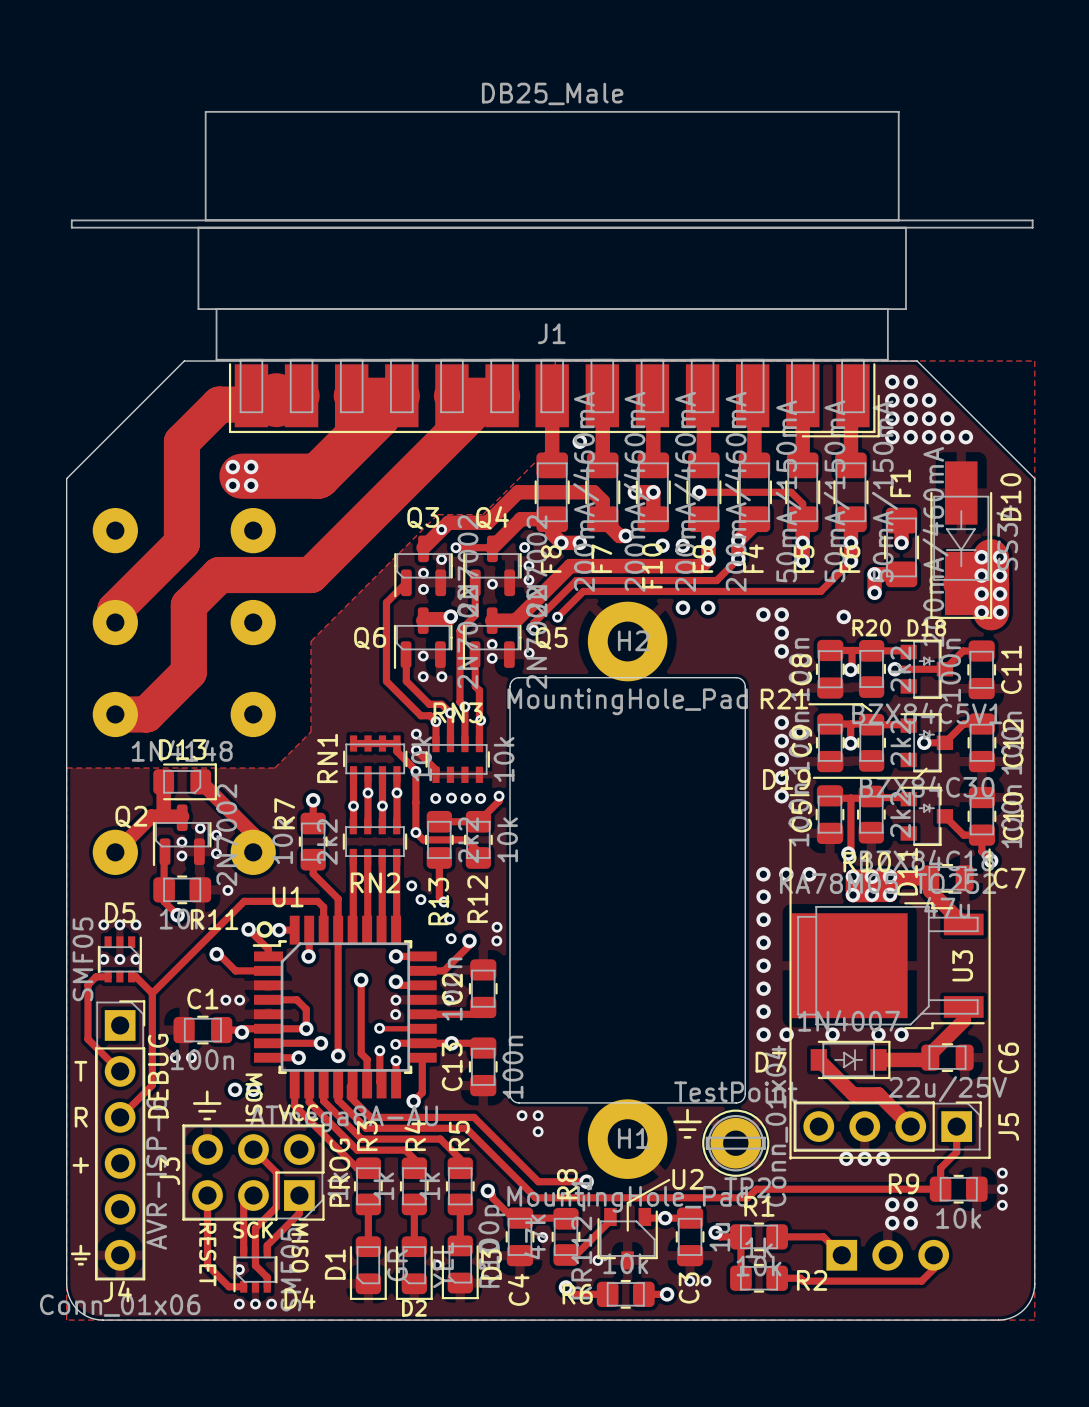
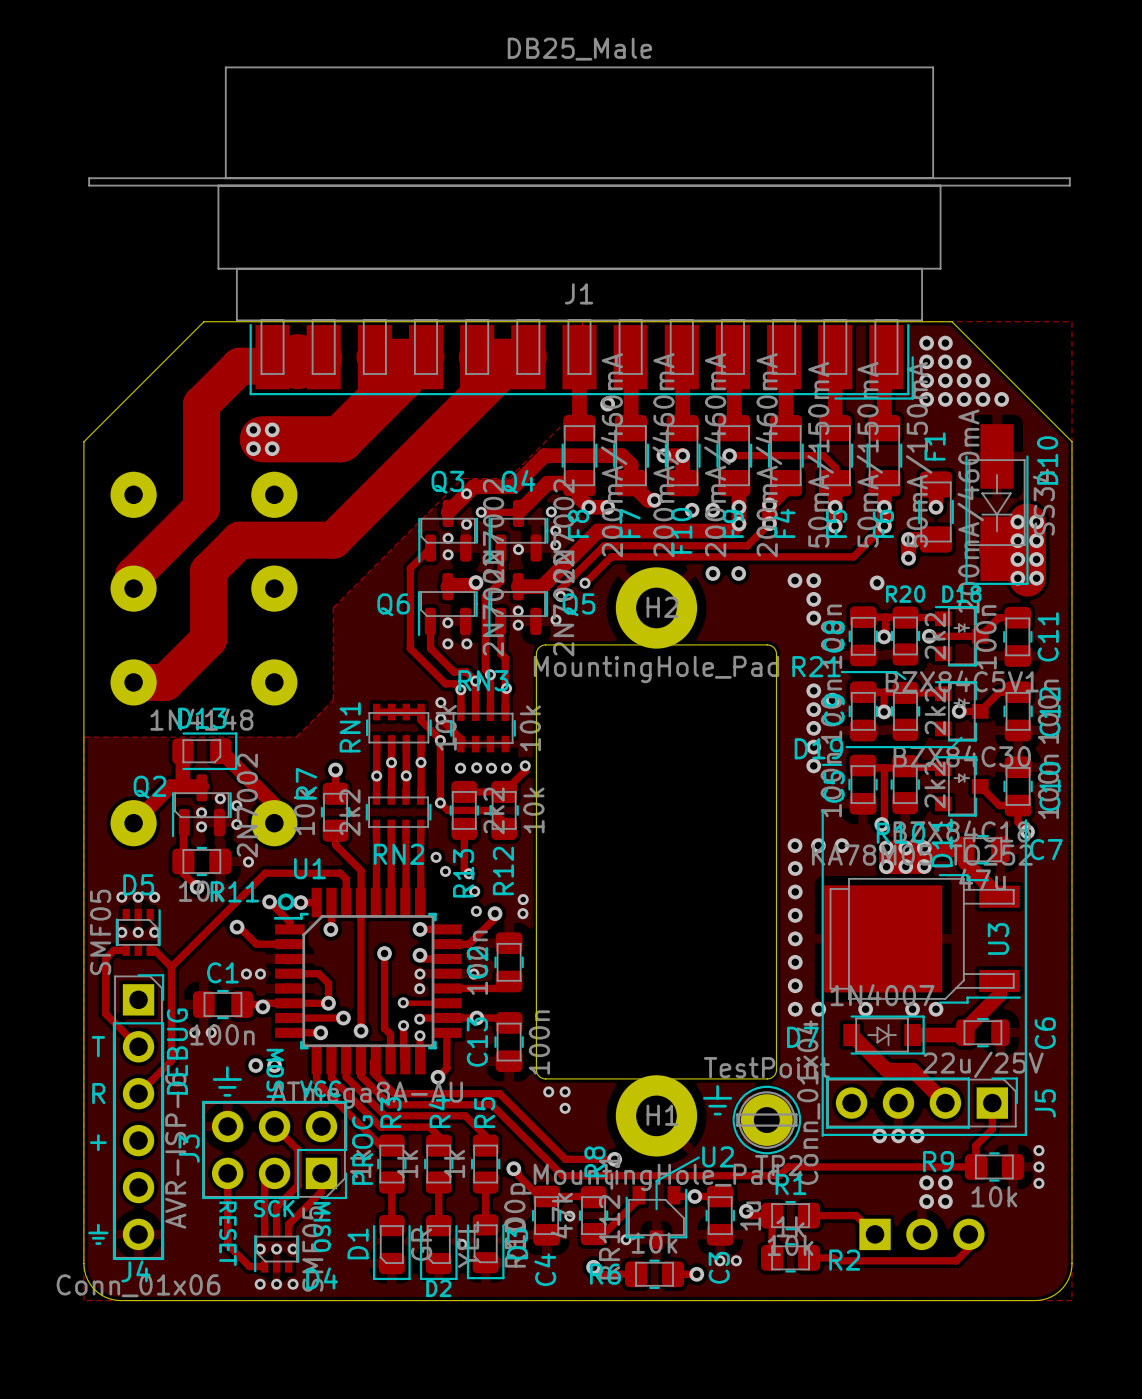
track: (255, 1252) (255, 1265) (267, 1277) (267, 1286) -> none
via: none -> (276, 1249)
via: none -> (293, 1249)

